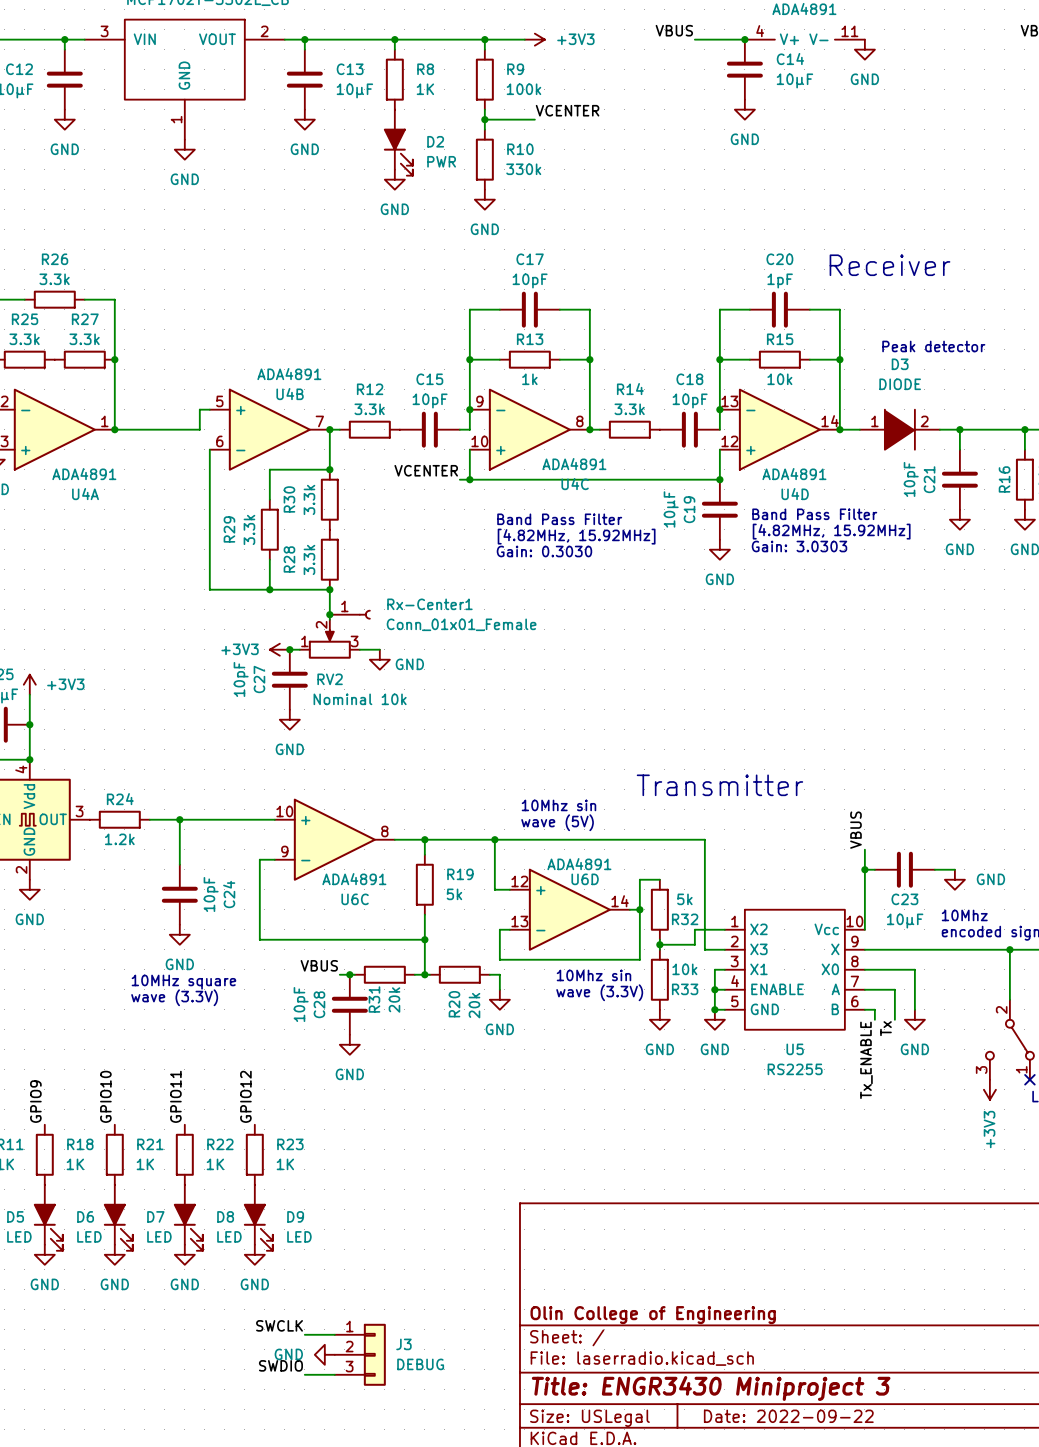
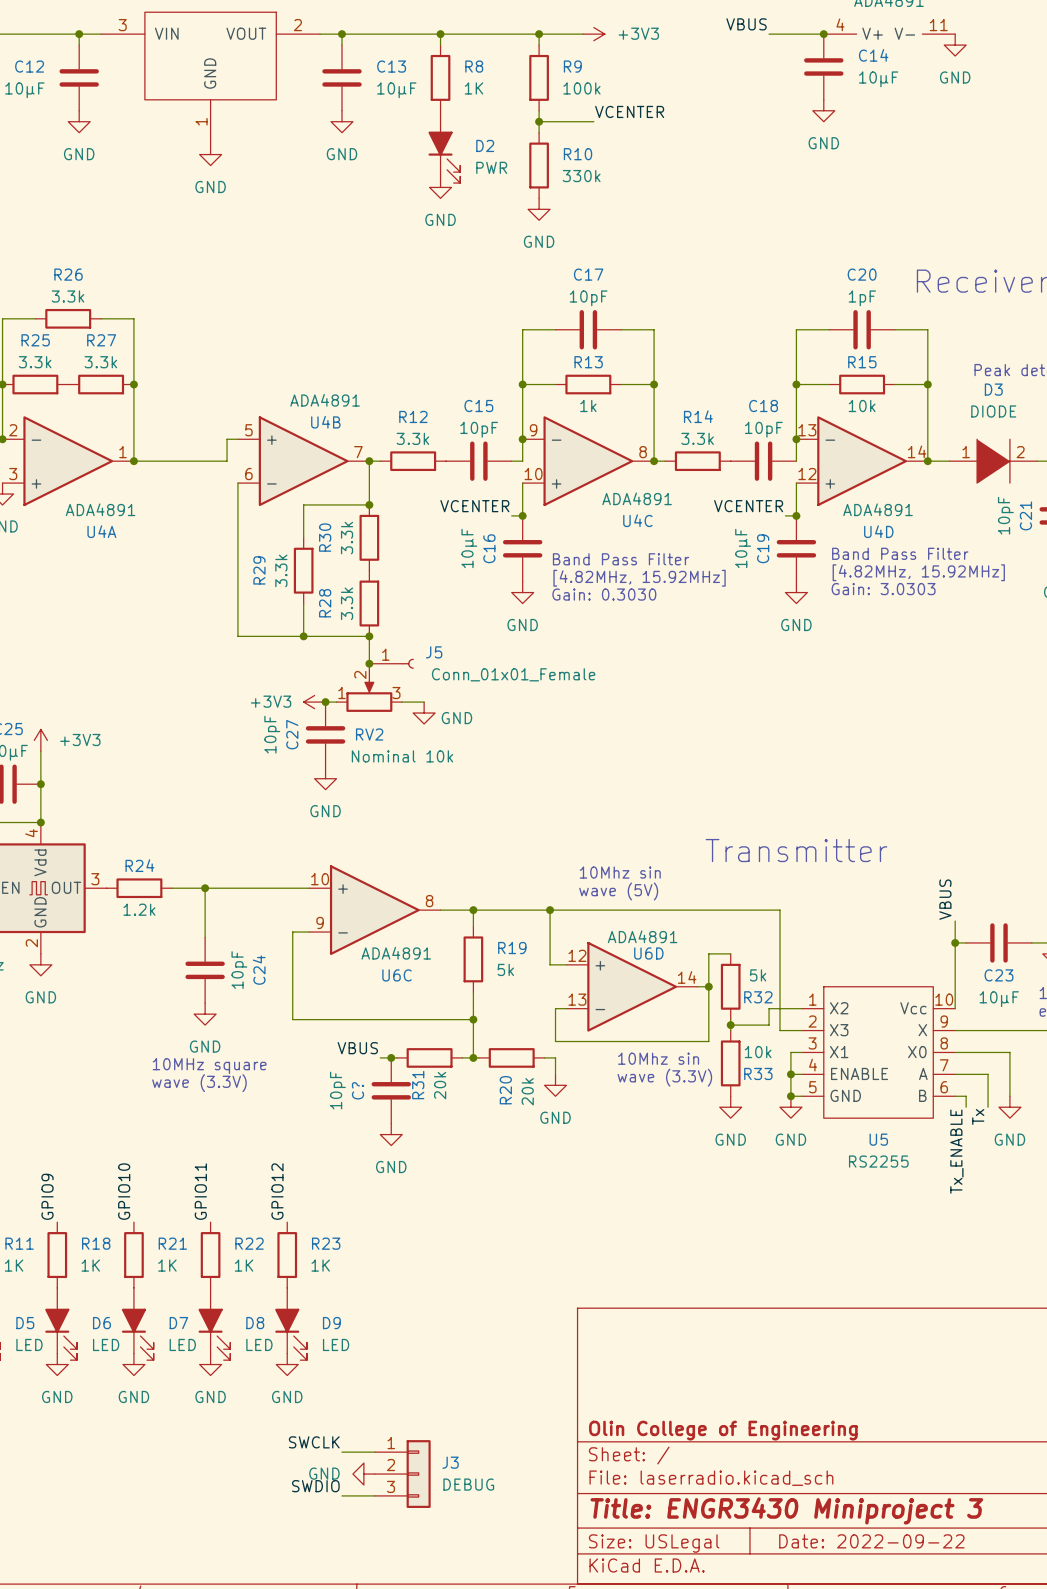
label: none -> VCENTER (748, 506)
wire: (469, 479) (709, 479) -> none
C16: none -> 10µF (522, 548)
power symbol: none -> GND (522, 592)
Rx-Center1 name: Rx-Center1 (429, 604) -> J5 (434, 652)
C28 name: C28 (319, 1004) -> C? (358, 1090)

